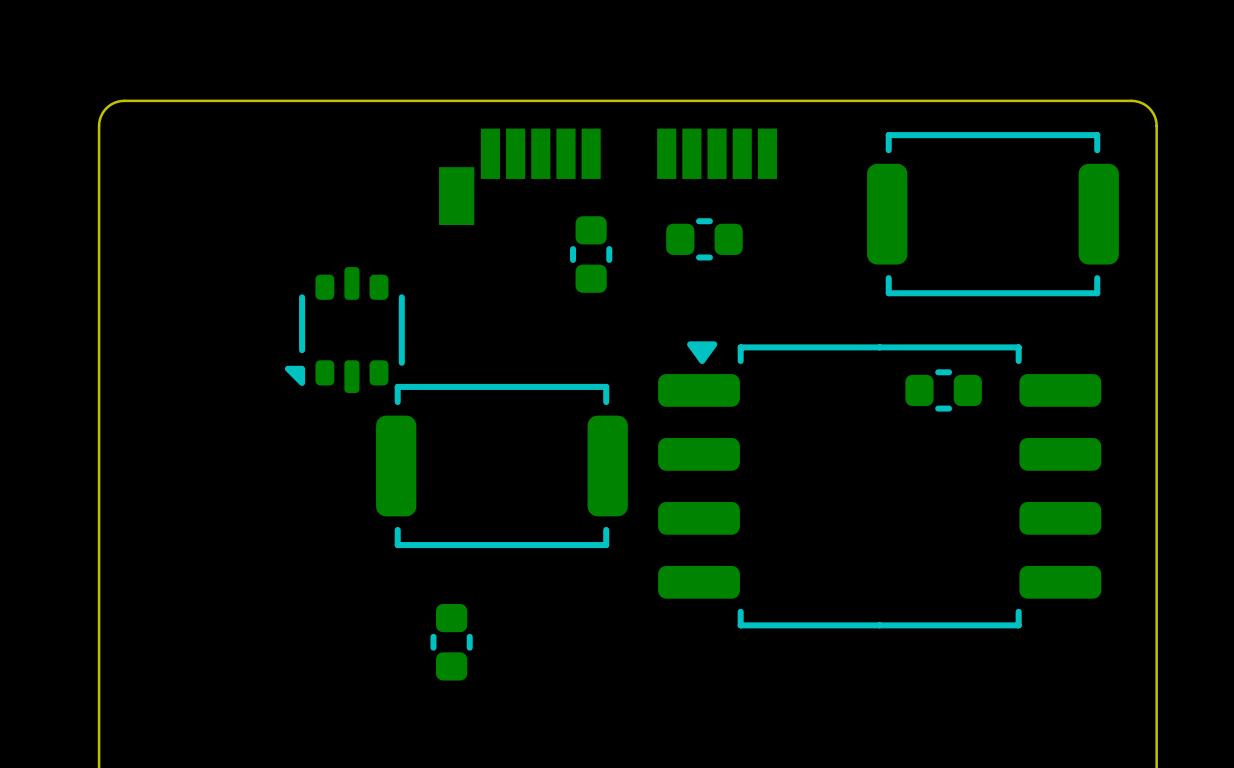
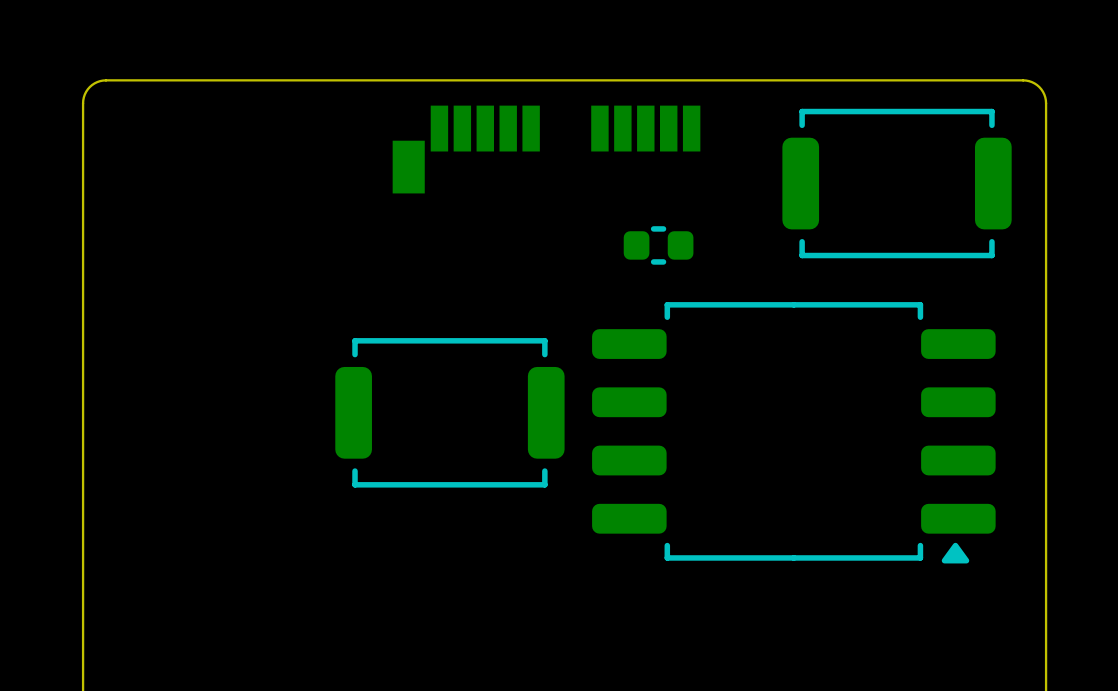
part position: (704, 239) -> (658, 245)
part: (591, 254) -> none
part: (344, 330) -> none
part: (943, 390) -> none
part rotation: 0° (879, 484) -> 180° (793, 432)
part: (451, 642) -> none

